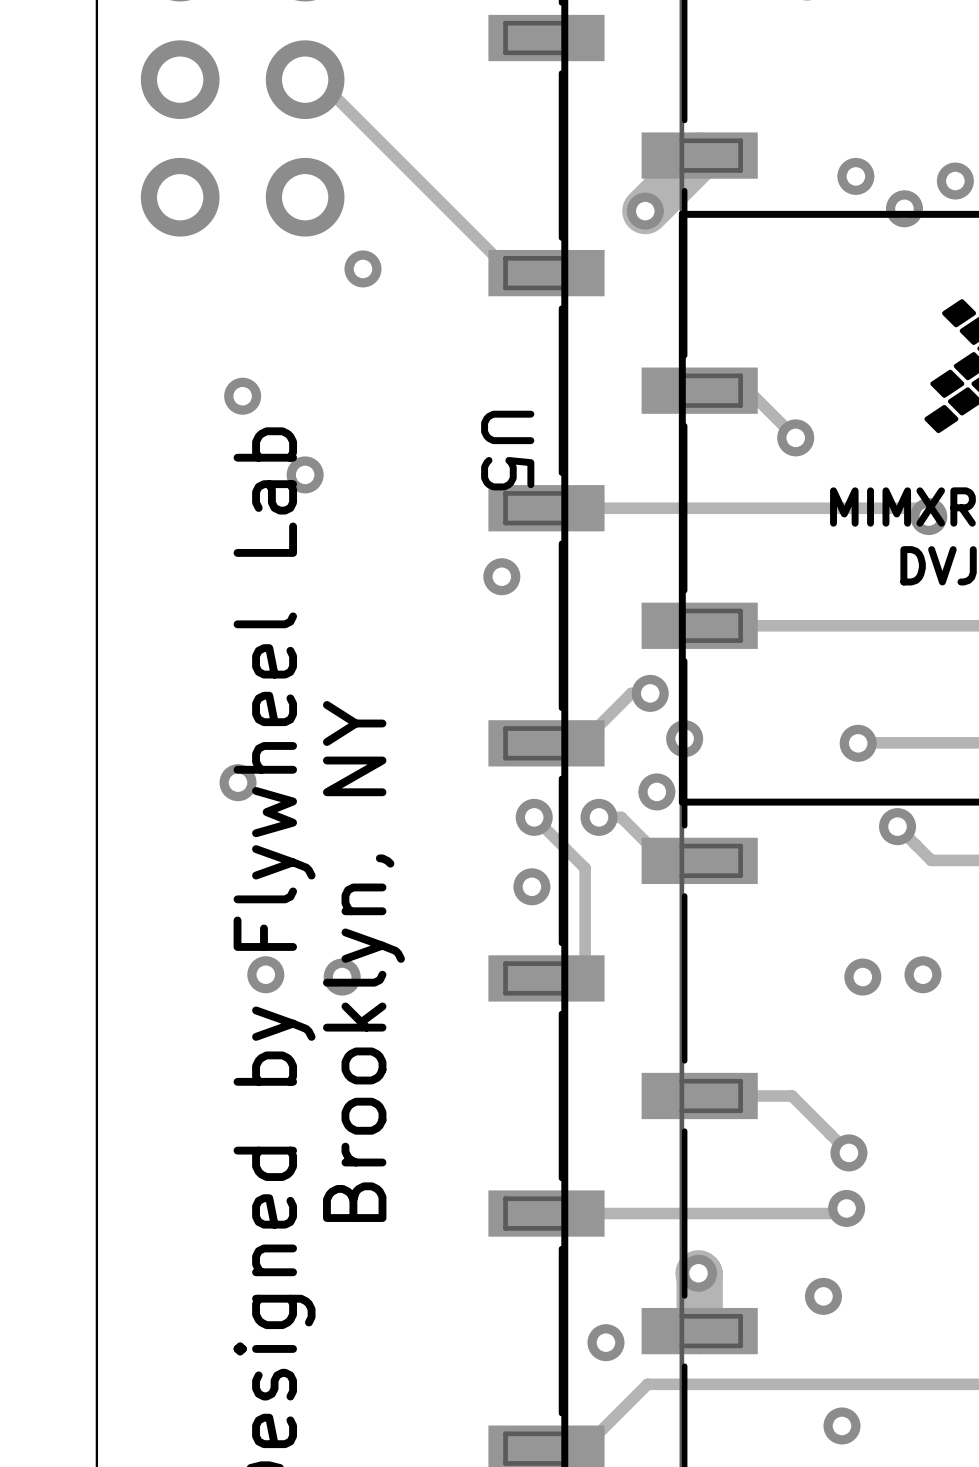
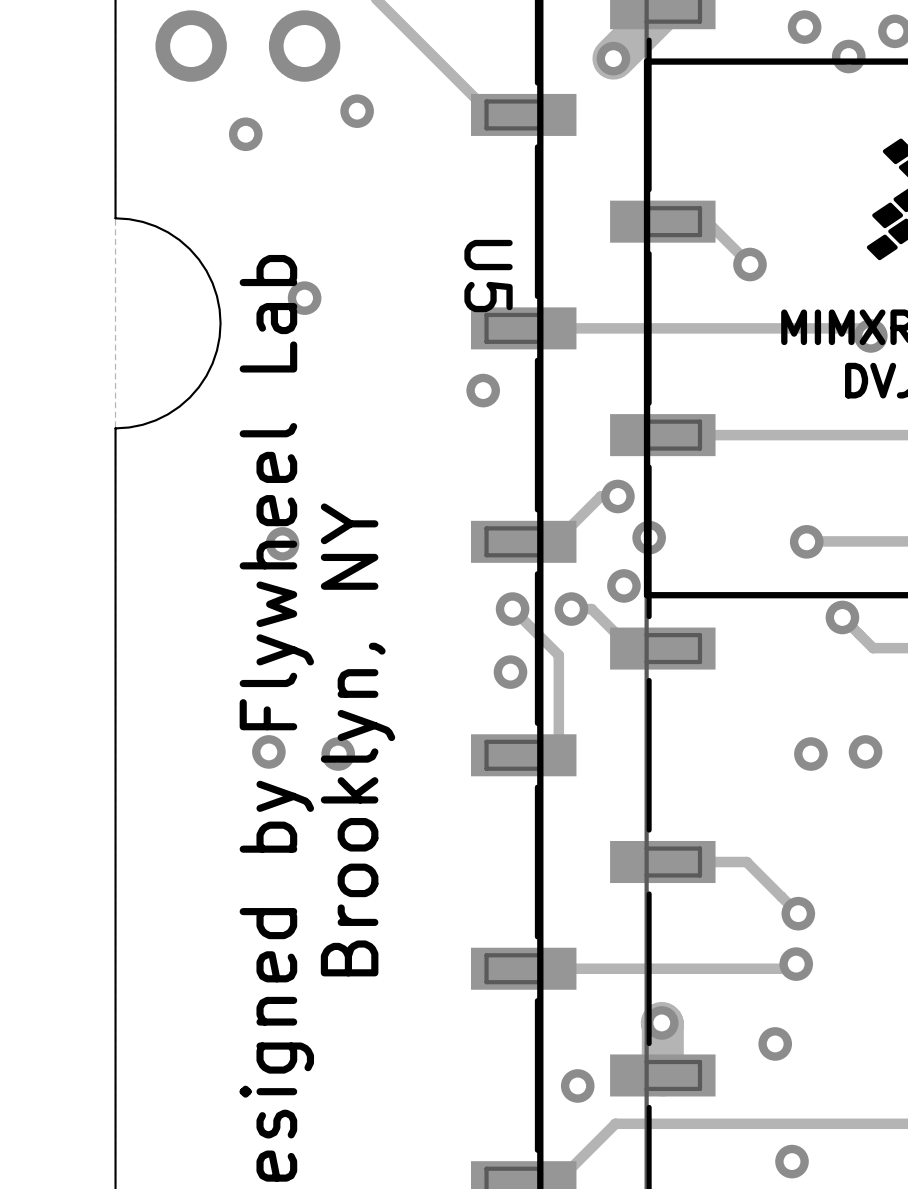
board edge: (96, 386) (96, 618) -> (115, 218) (129, 219) (155, 226) (168, 232) (189, 249) (206, 270) (212, 283) (219, 309) (220, 323) (219, 337) (212, 363) (206, 375) (189, 397) (168, 414) (155, 420) (129, 427) (115, 428)
via position: (242, 396) -> (245, 134)
via position: (238, 782) -> (282, 543)

